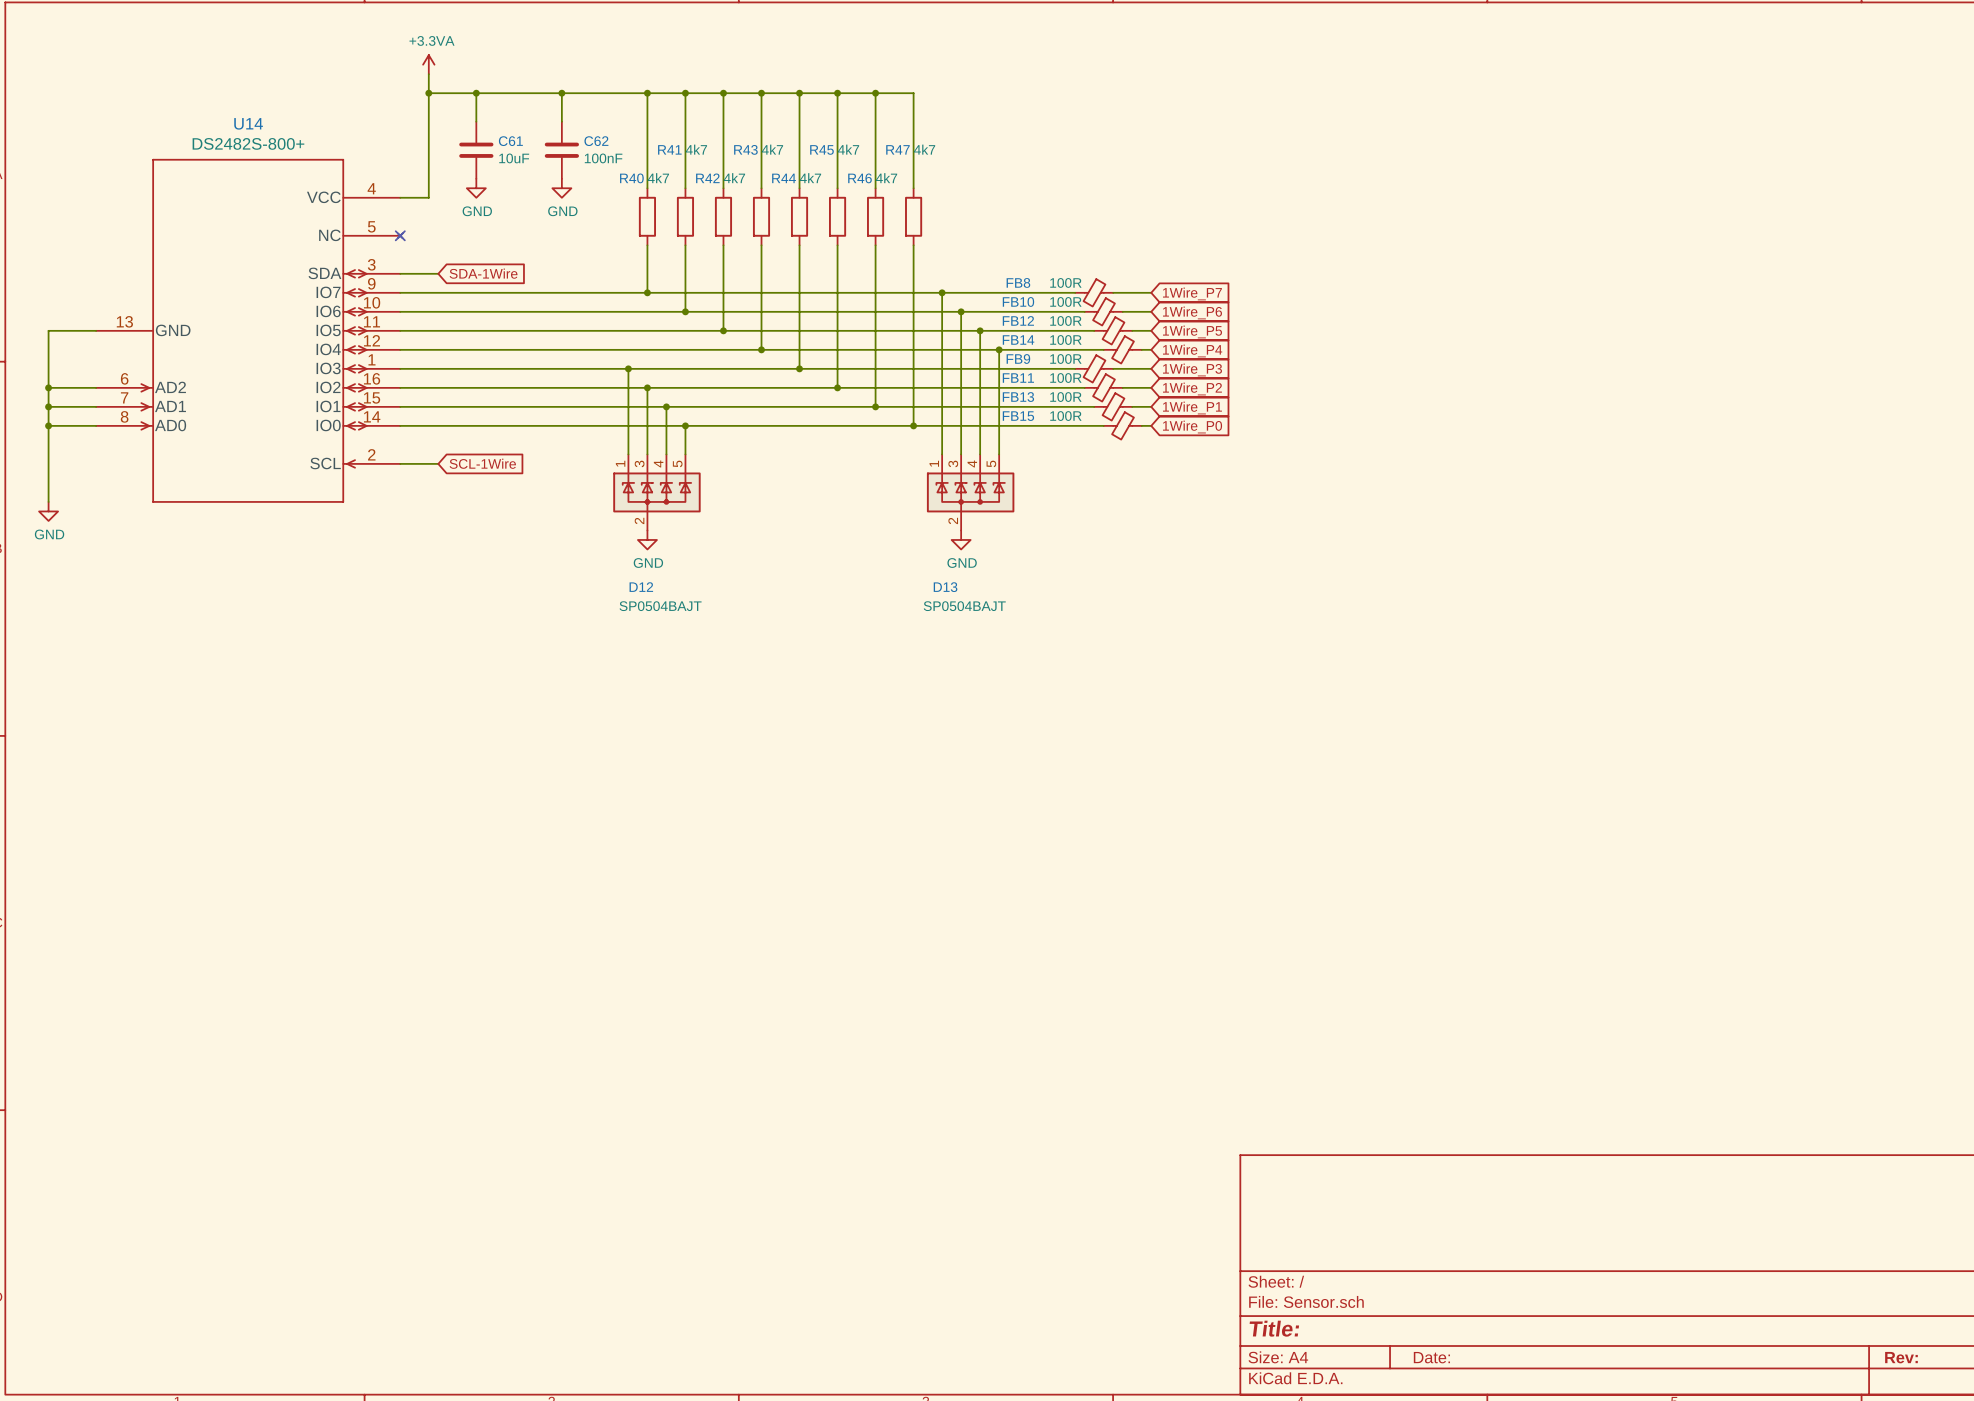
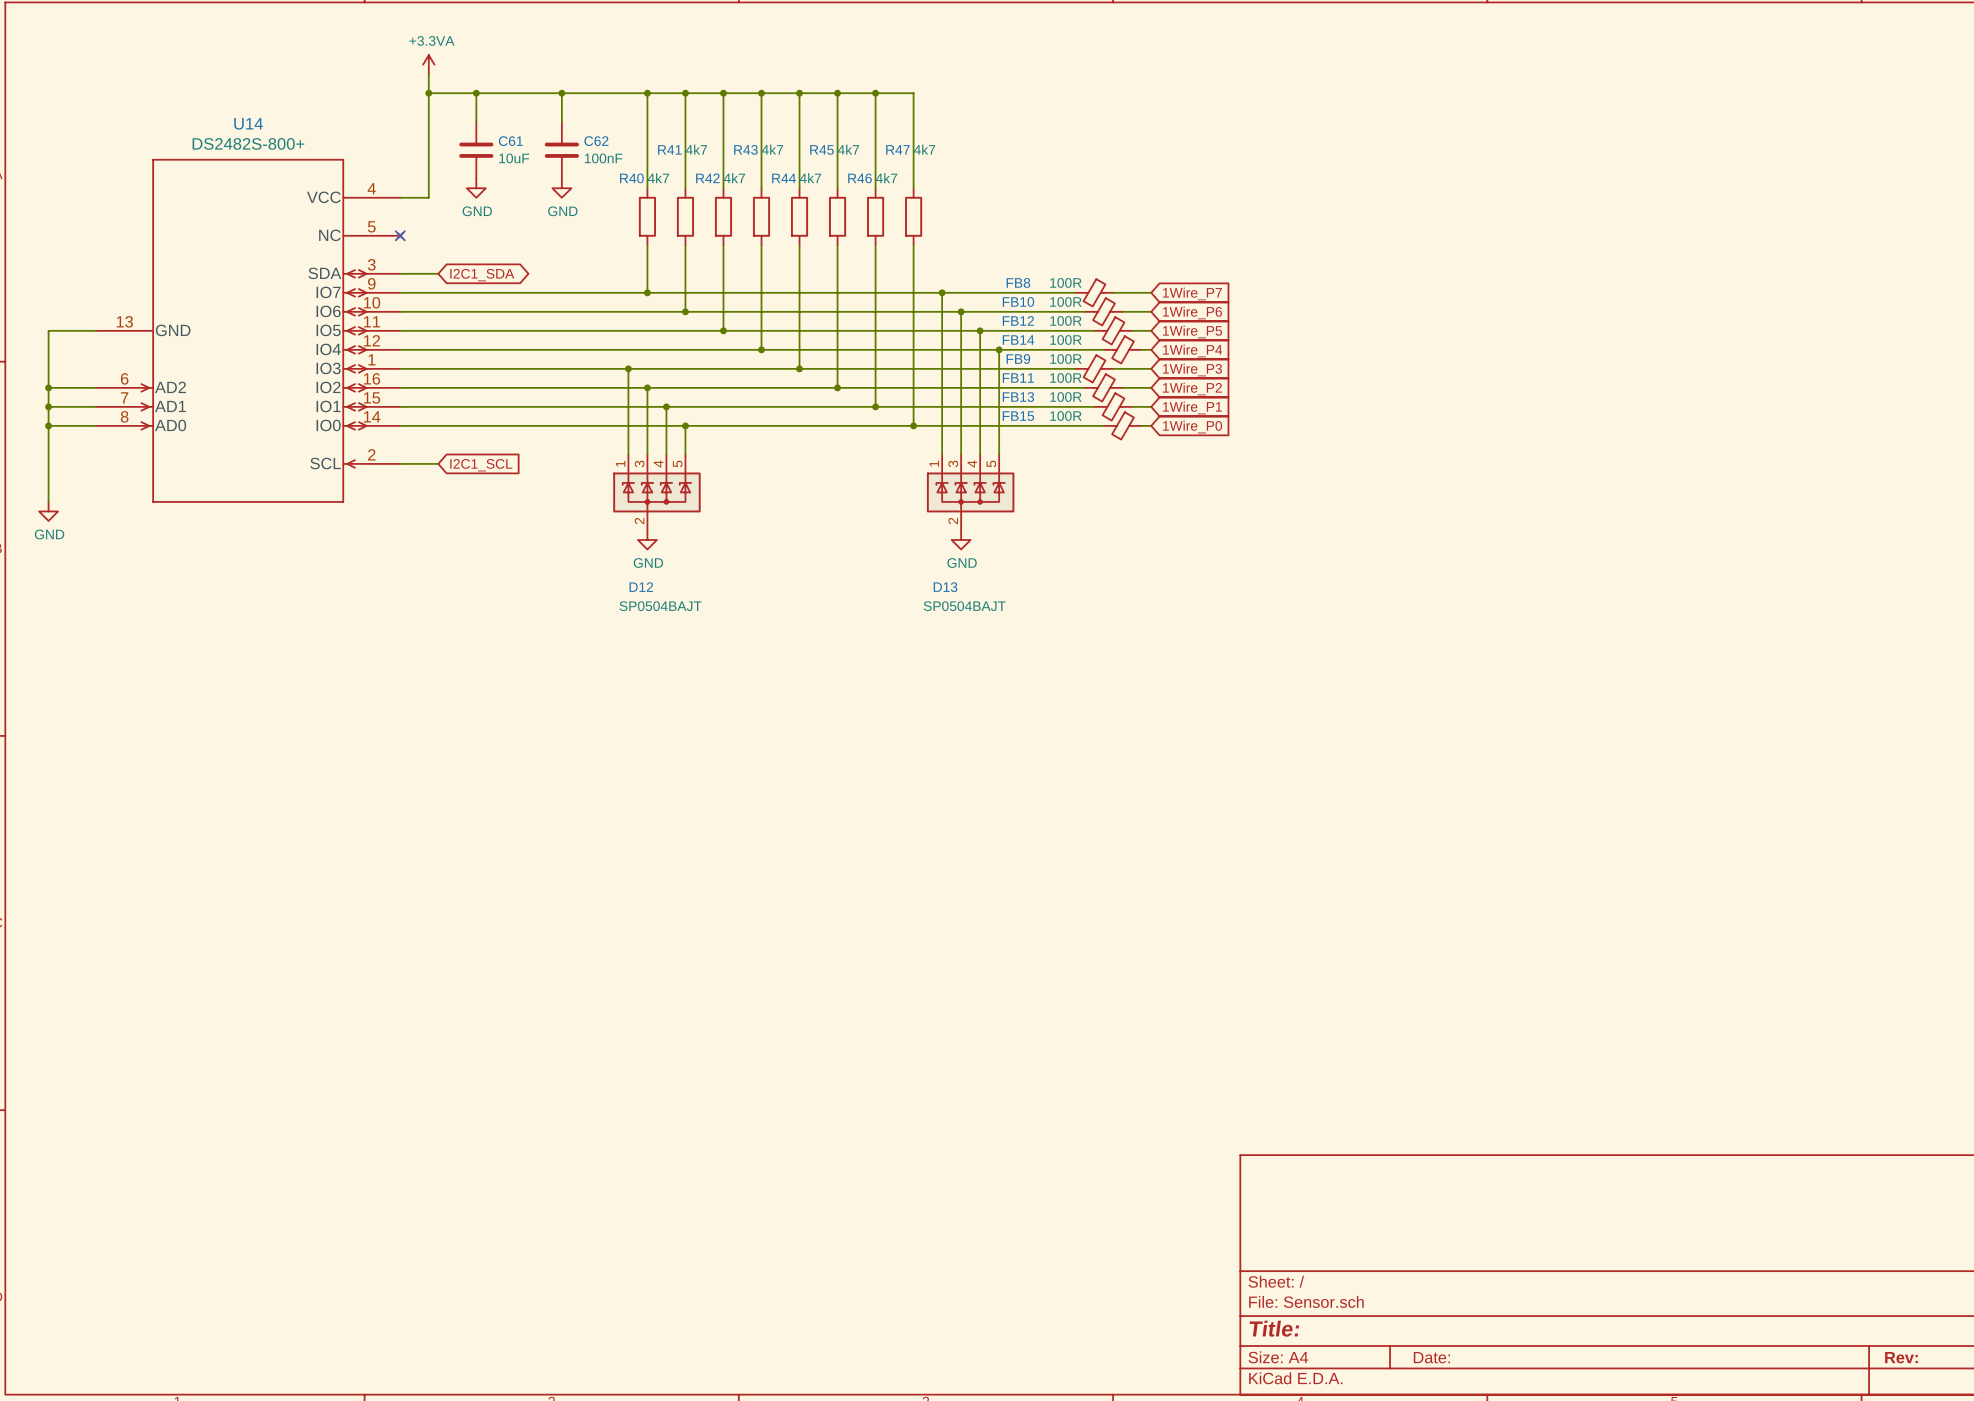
global label shape: input (483, 273) -> bidirectional (482, 275)
global label: SDA-1Wire (483, 273) -> I2C1_SDA (482, 275)
global label: SCL-1Wire (482, 463) -> I2C1_SCL (481, 465)

